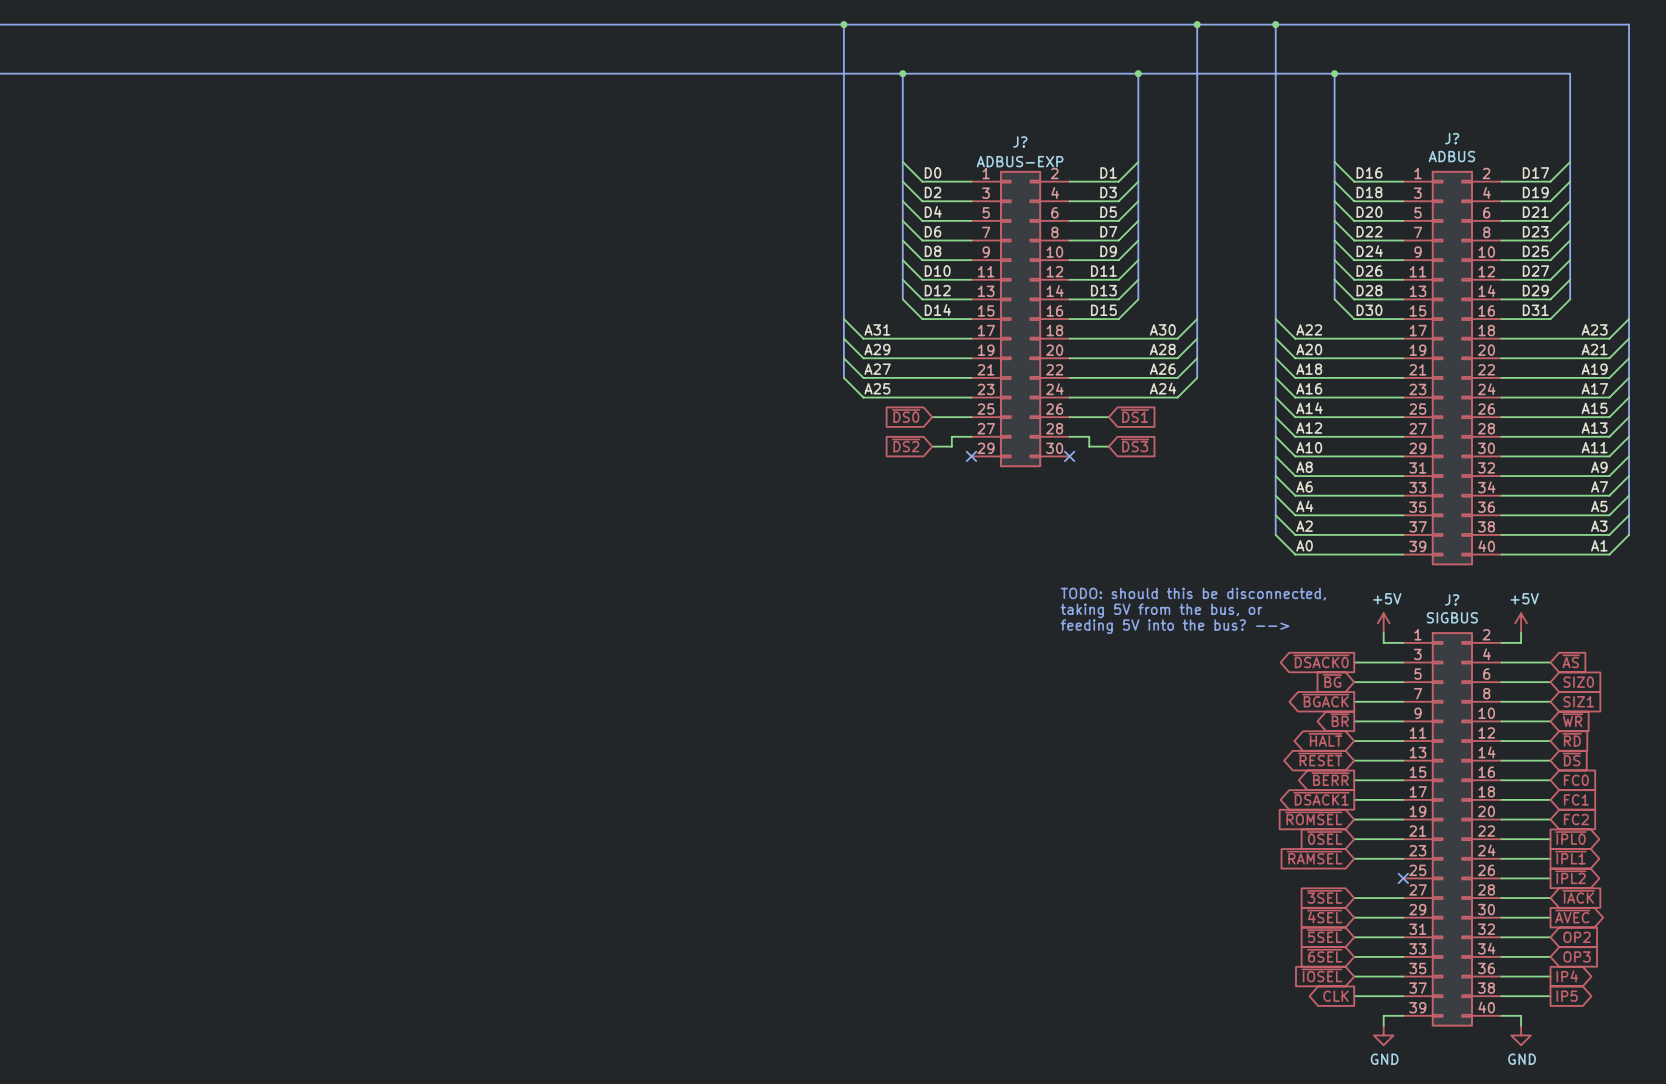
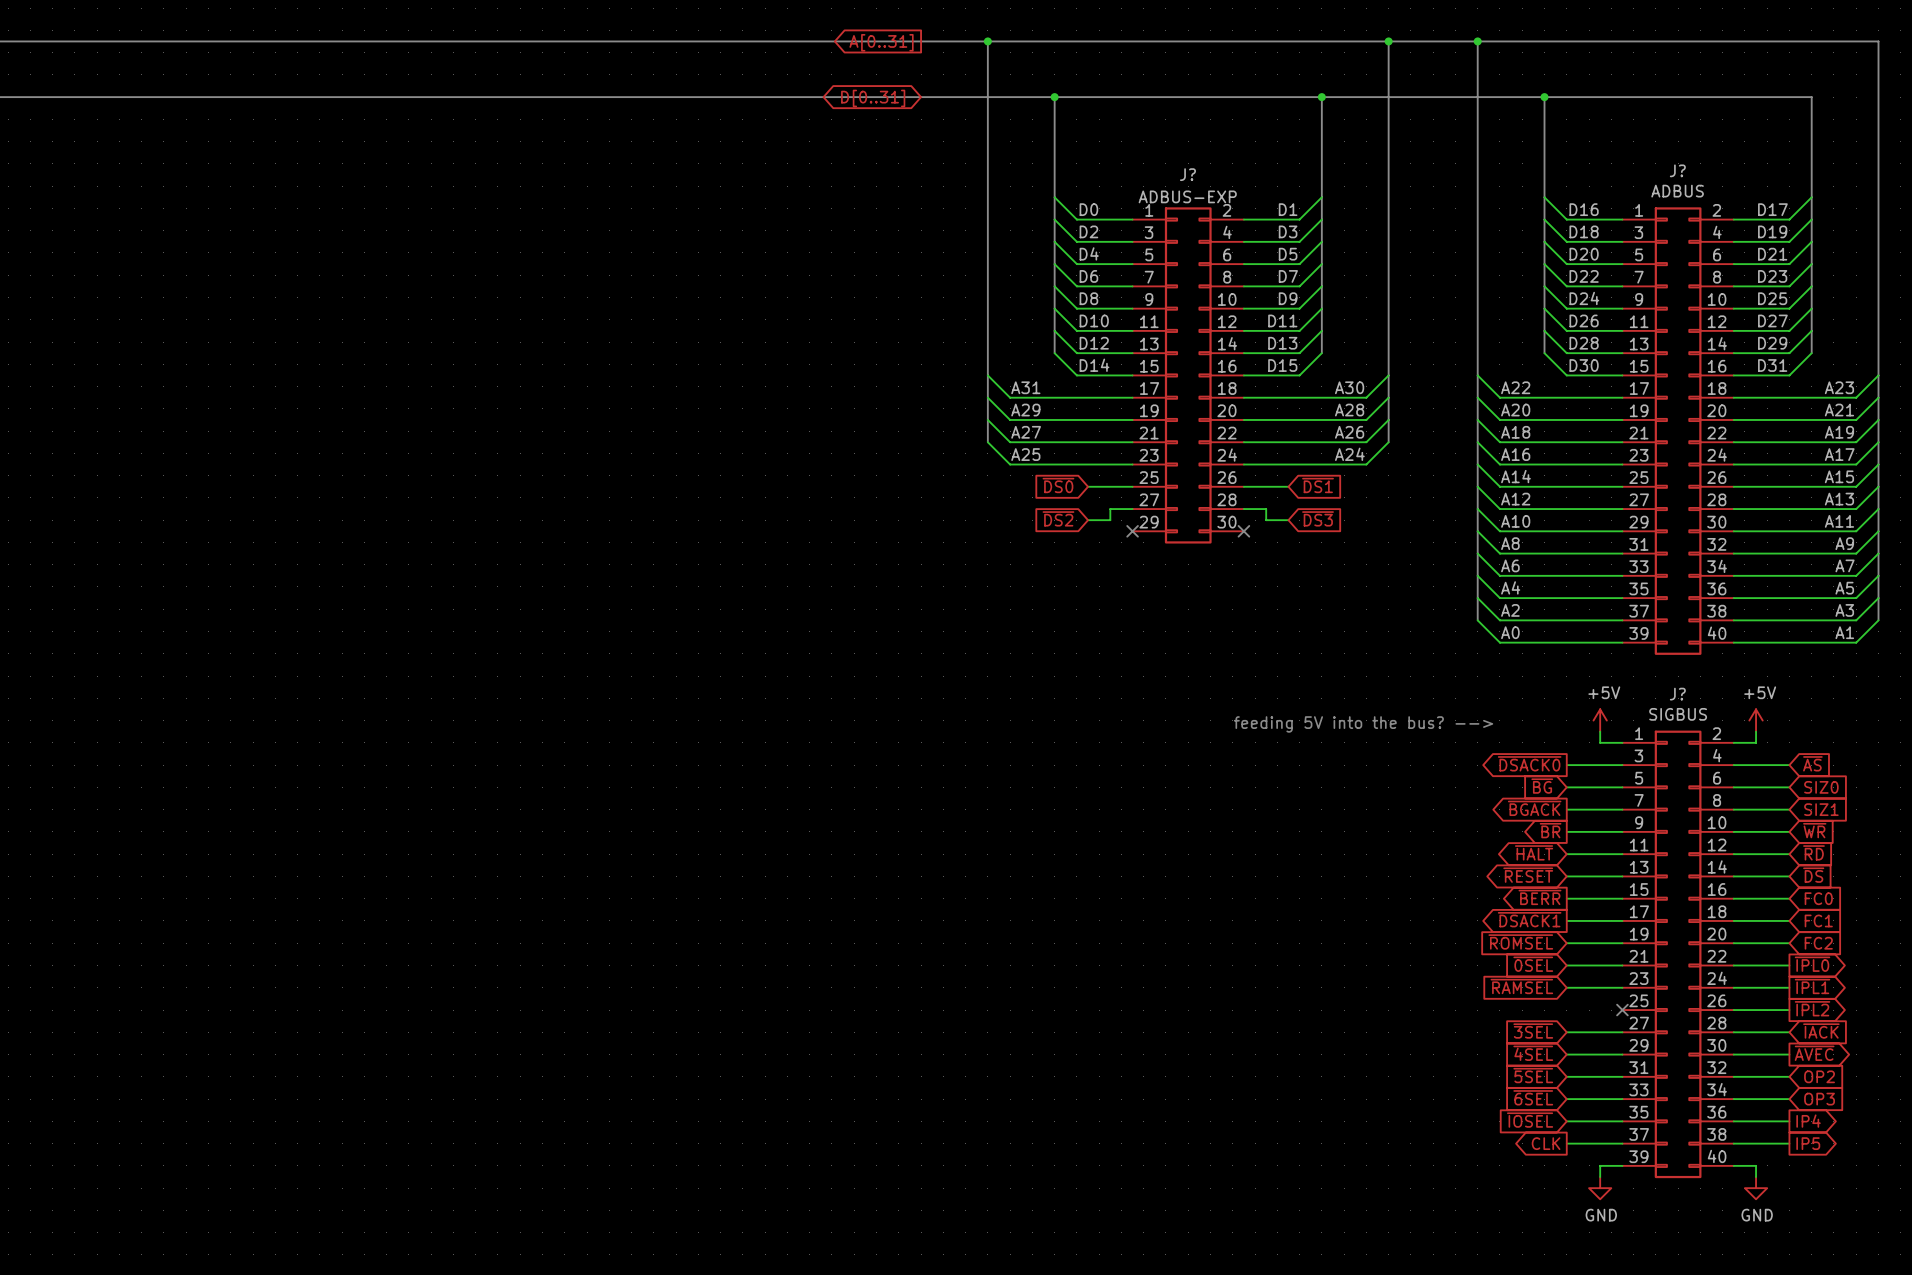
global label: none -> A[0..31] (881, 42)
global label: none -> D[0..31] (873, 98)
text: TODO: should this be disconnected, (1193, 594) -> none
text: taking 5V from the bus, or (1161, 610) -> none

